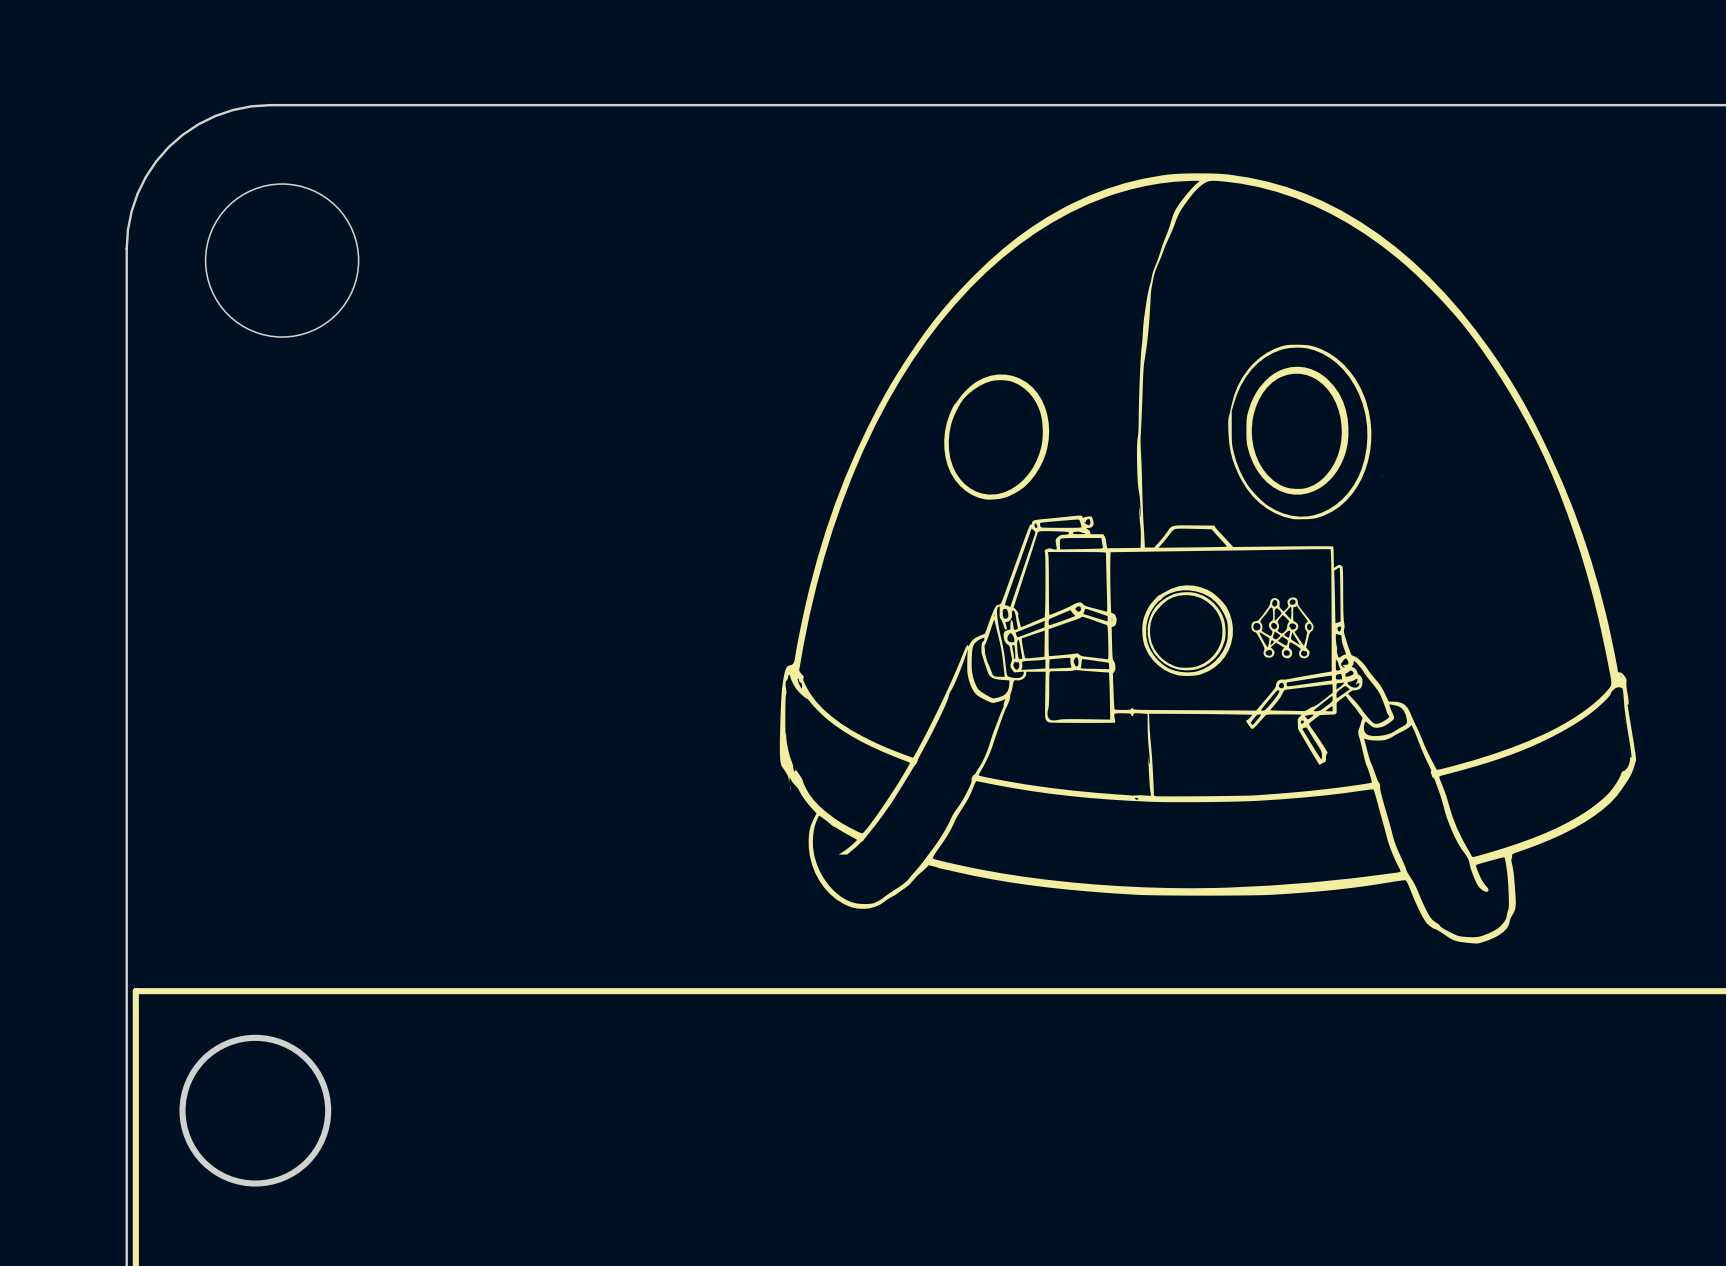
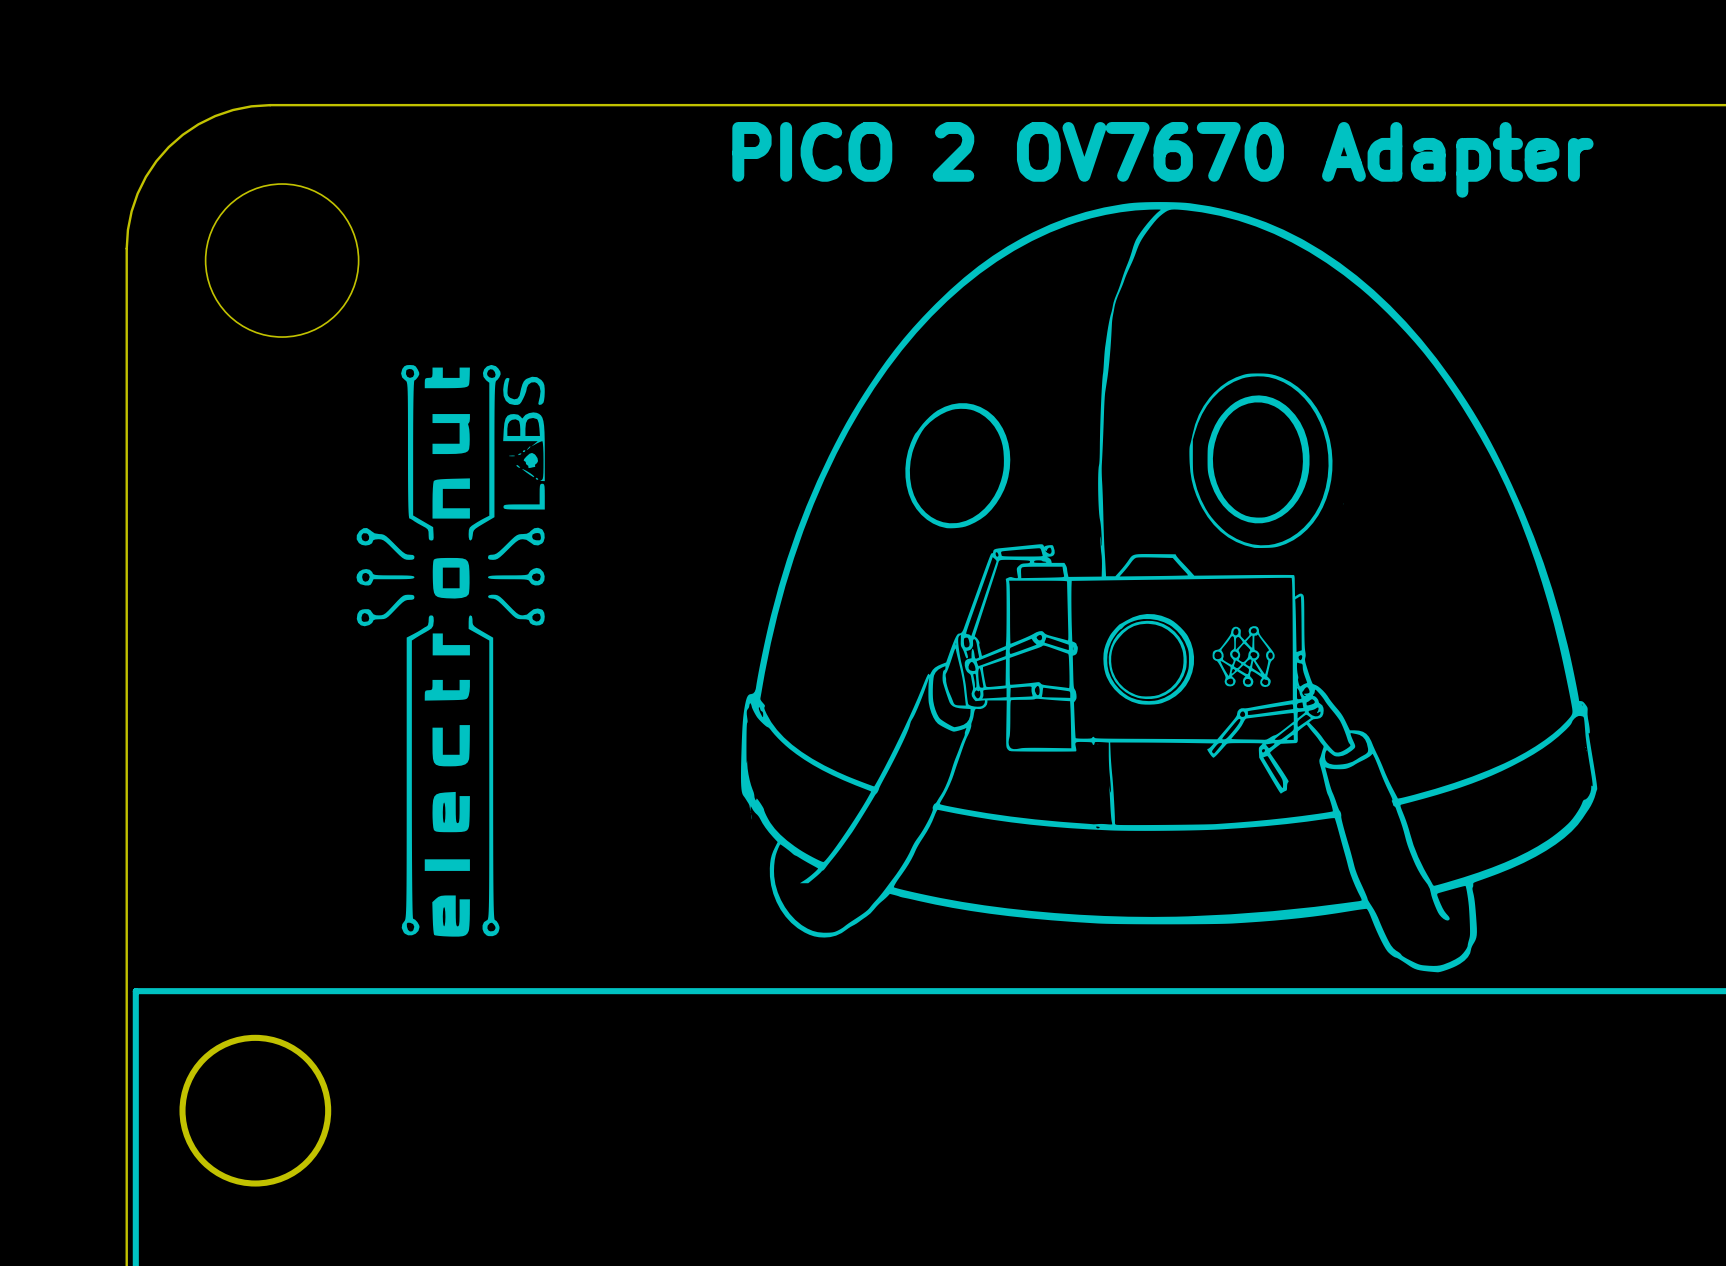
text: none -> PICO 2 OV7670 Adapter (1162, 159)
drawing: none -> [356, 364, 545, 937]
drawing position: (1207, 558) -> (1169, 587)

